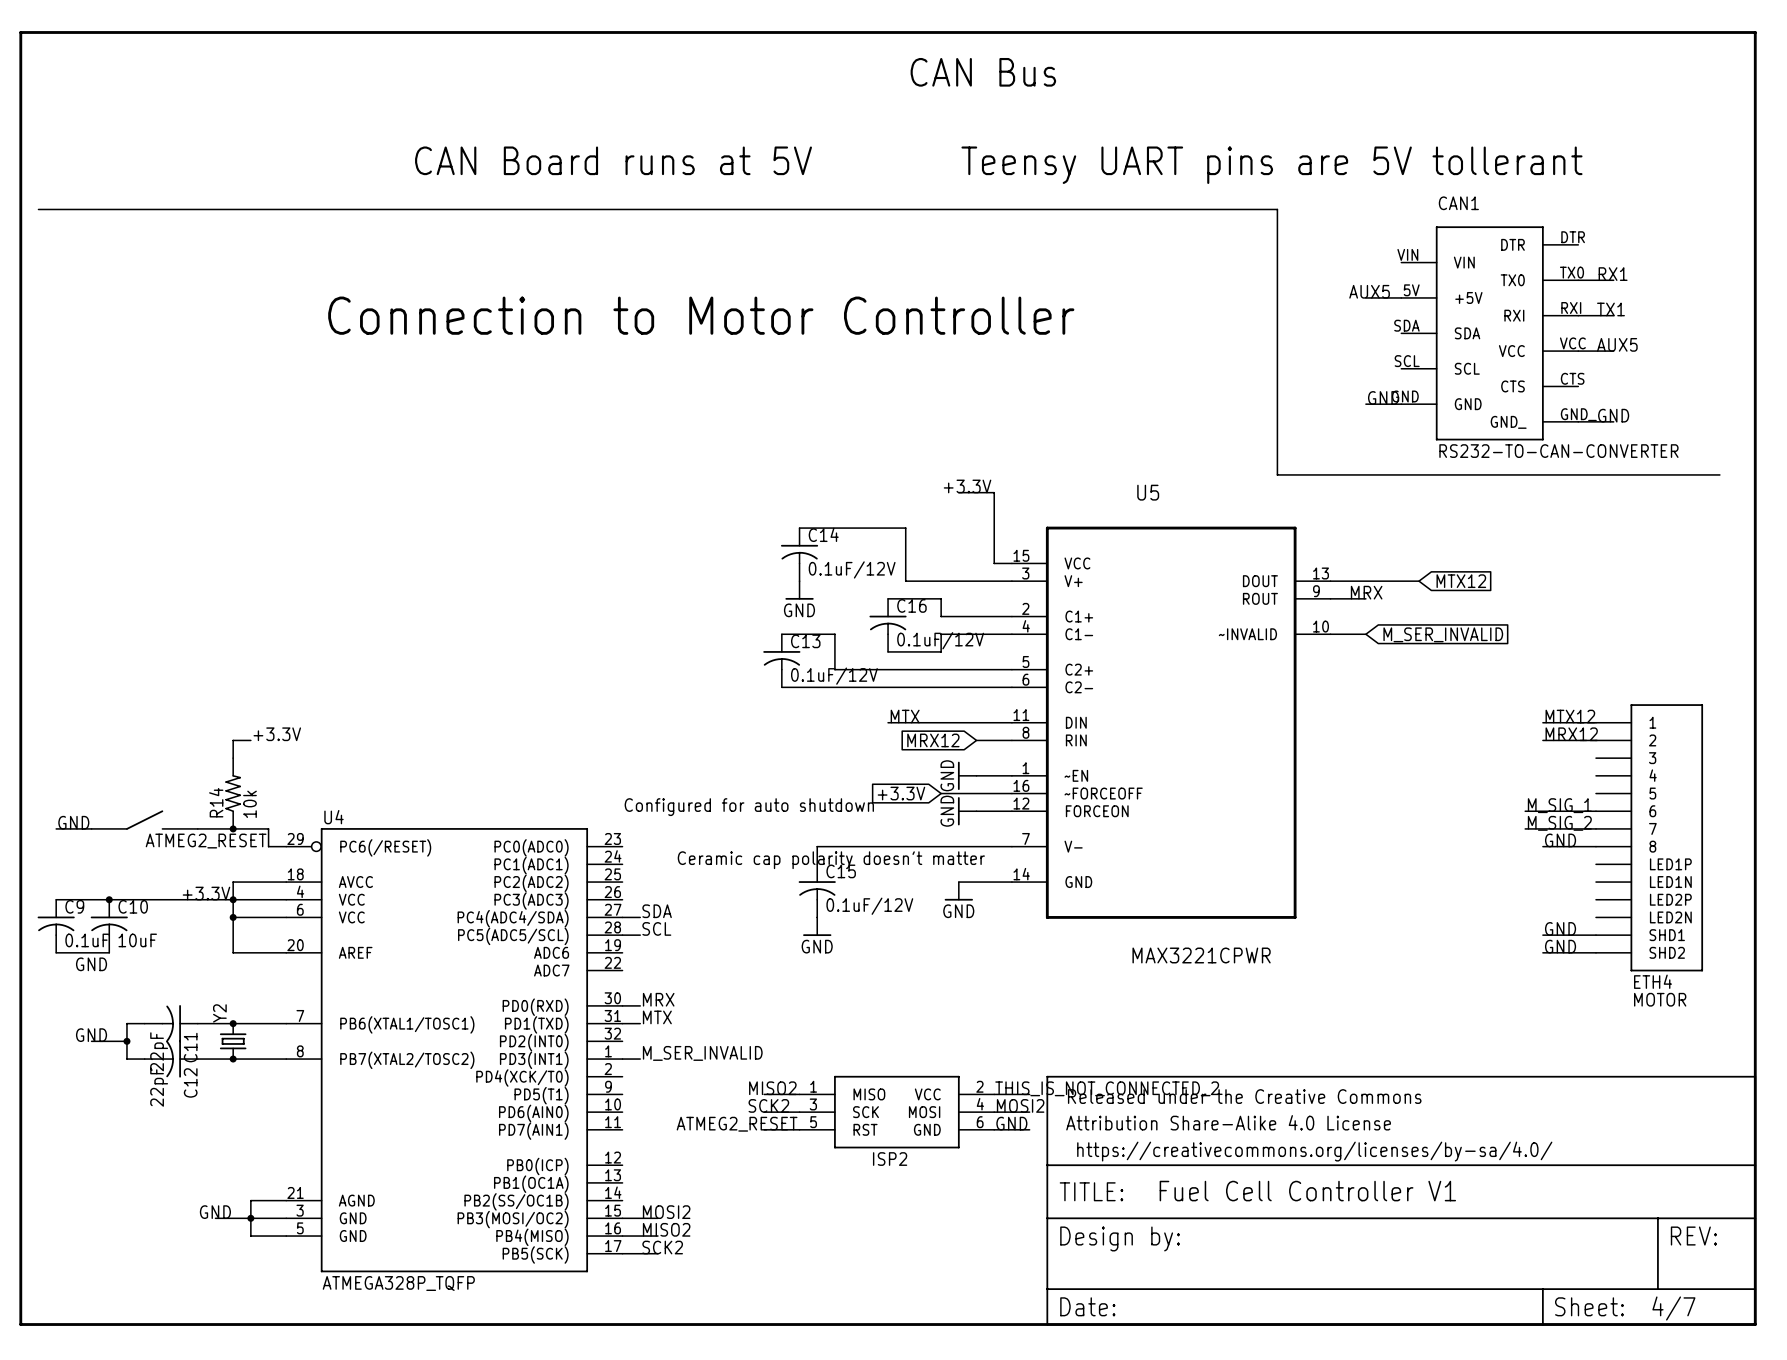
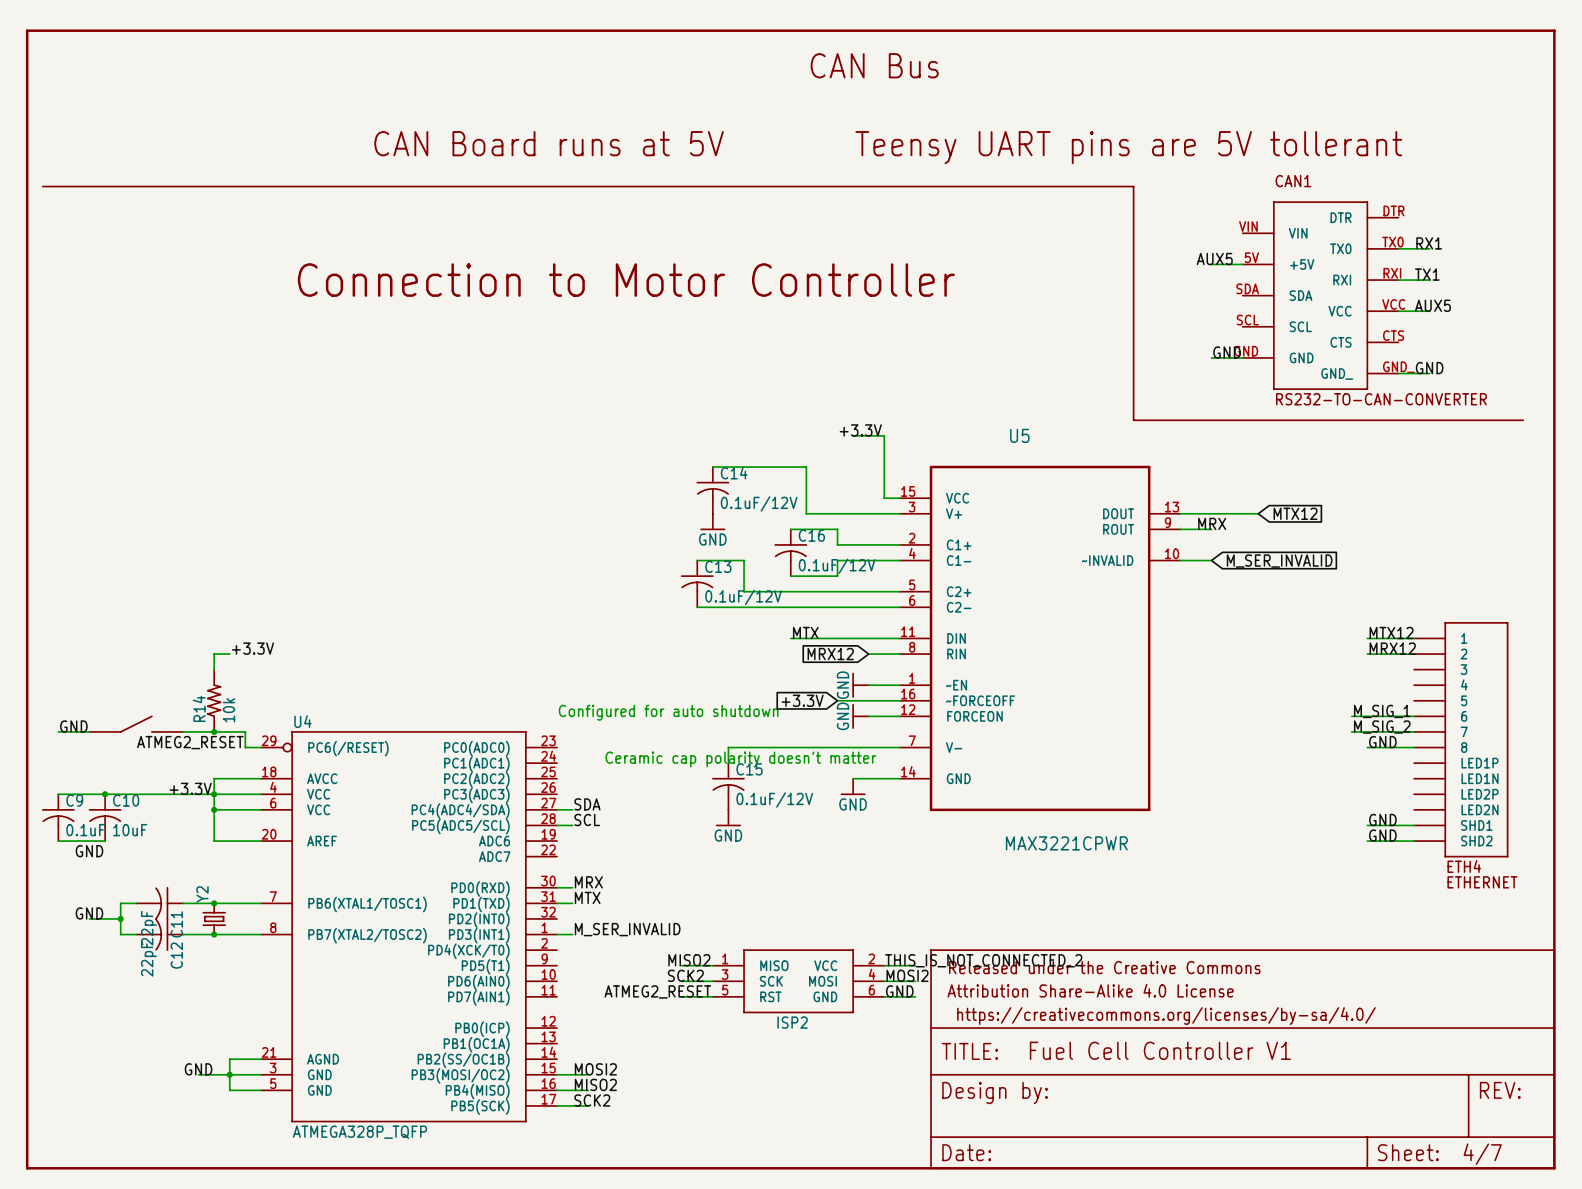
ETH4 value: MOTOR (1660, 999) -> ETHERNET (1482, 882)

